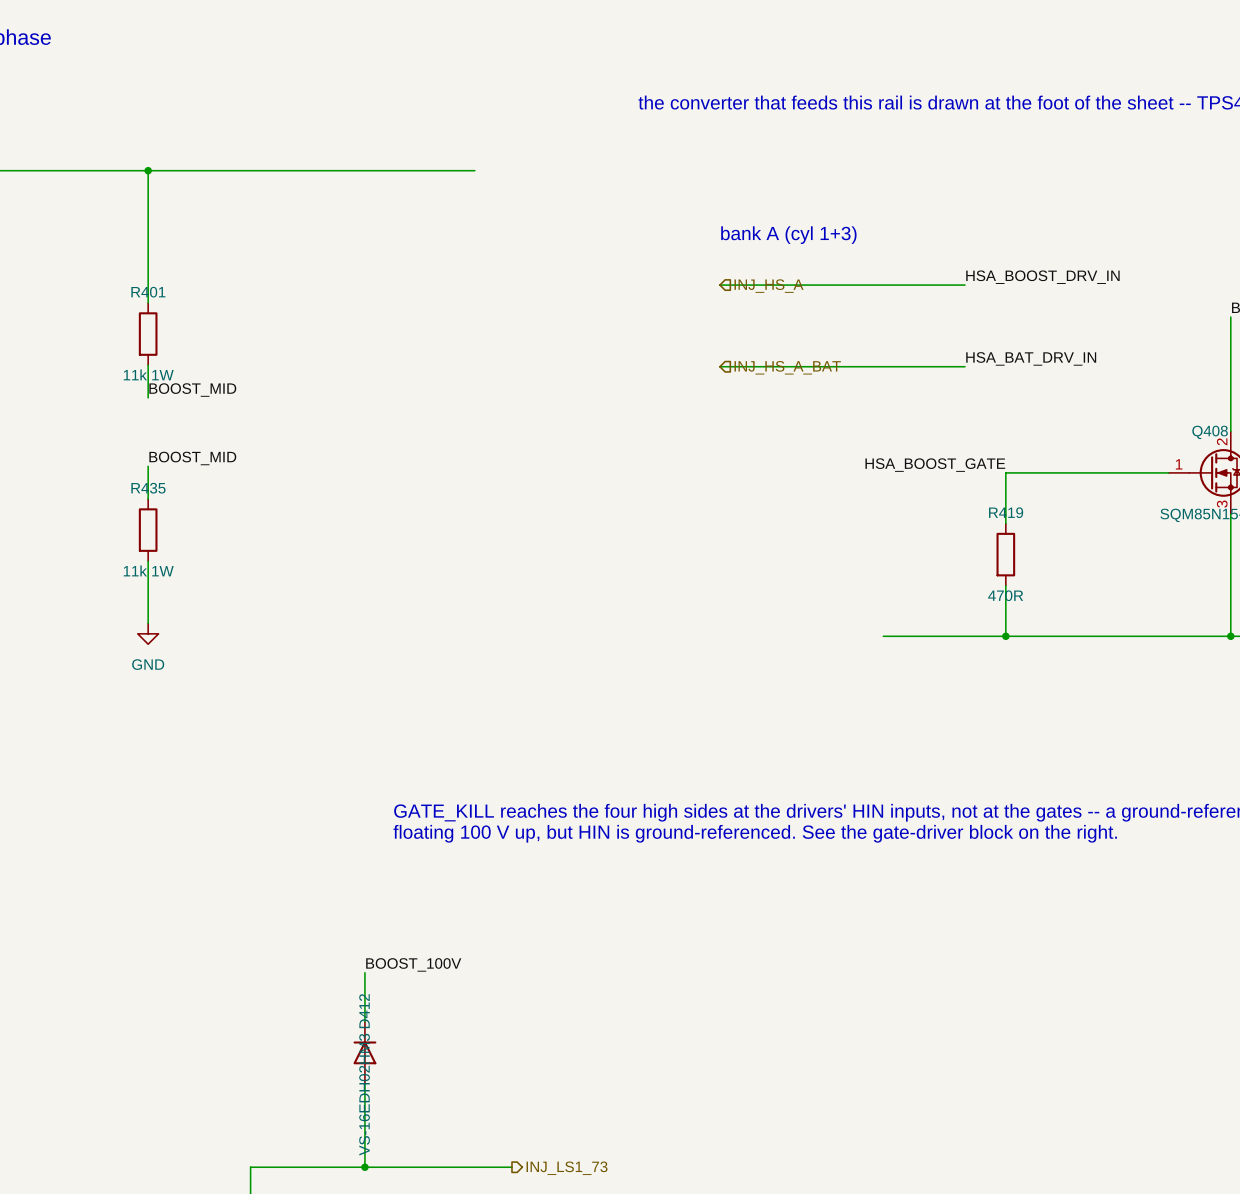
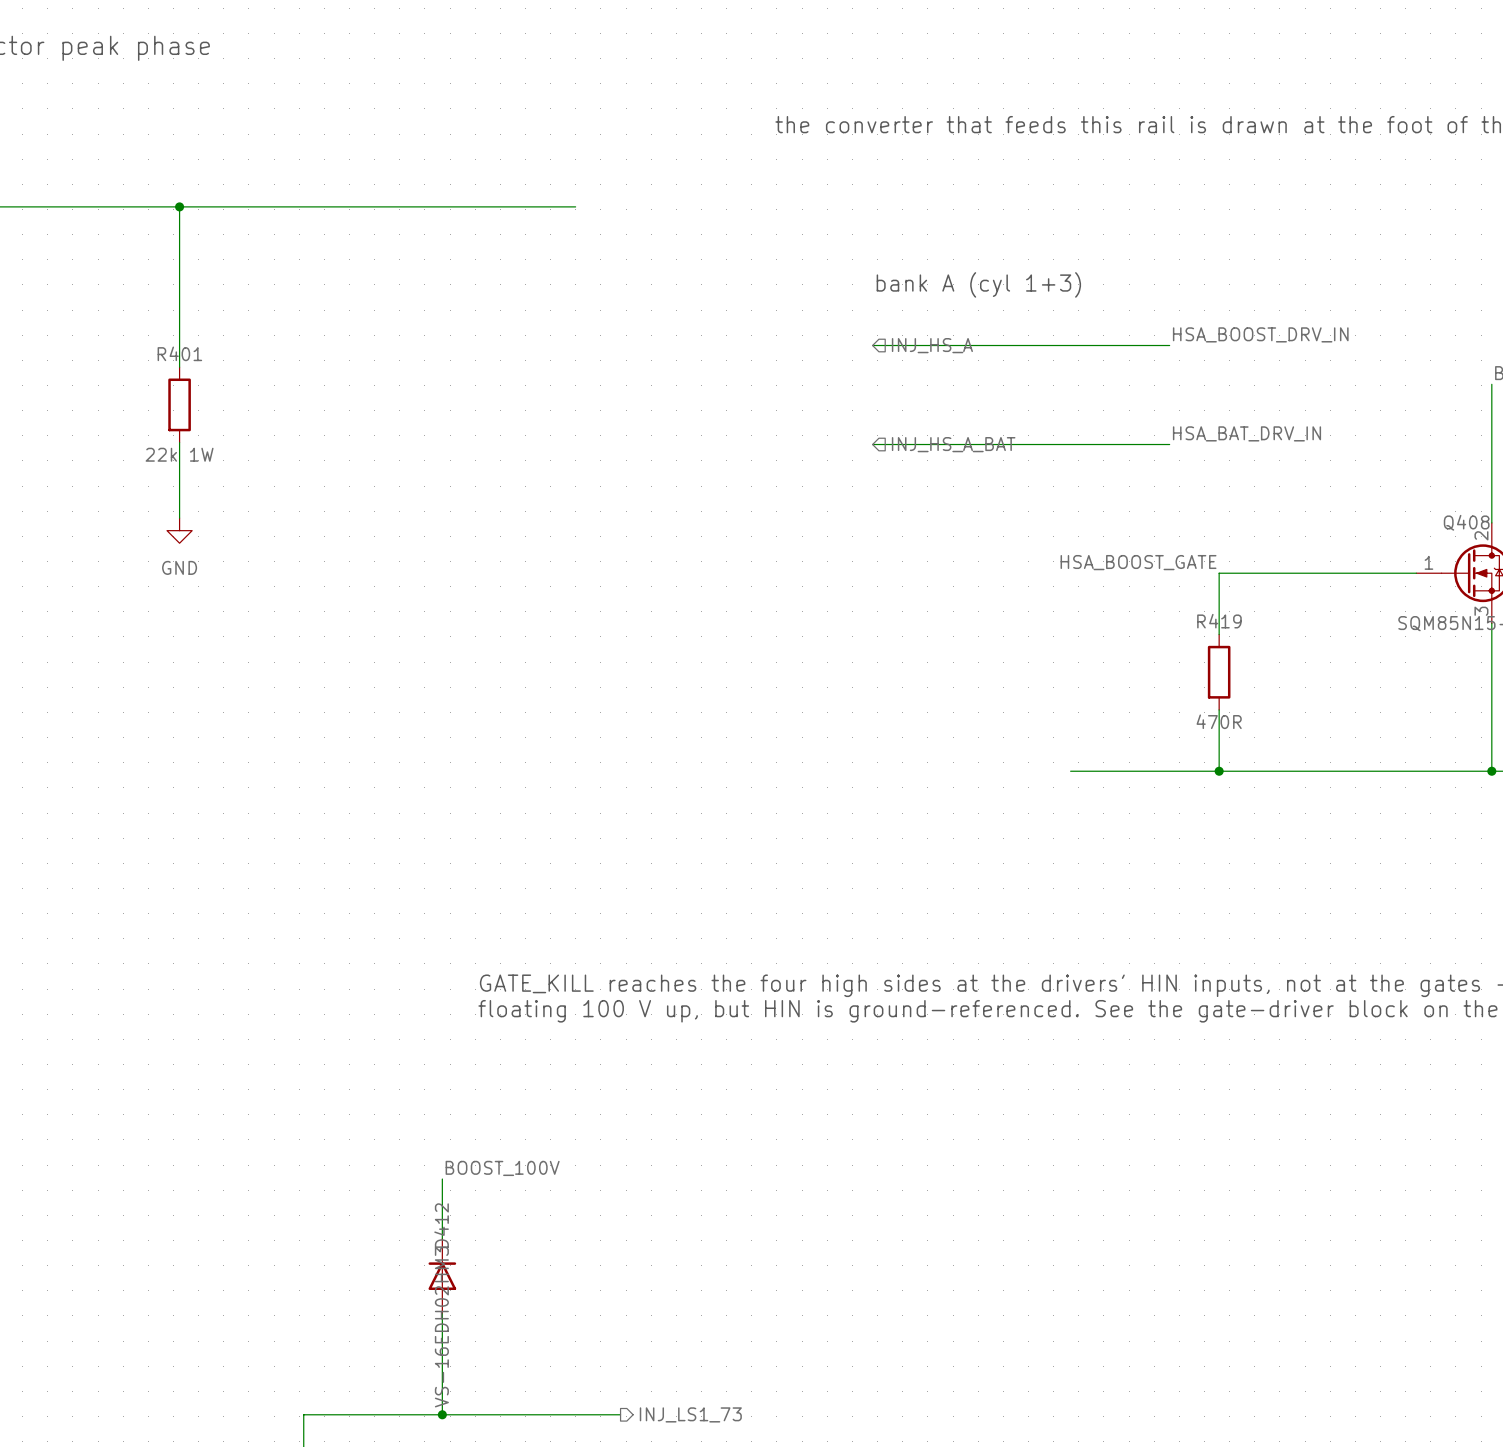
R401 value: 11k 1W (148, 374) -> 22k 1W (179, 454)
label: BOOST_MID (192, 390) -> none
wire: none -> (179, 482) (179, 518)
label: BOOST_MID (192, 458) -> none
wire: (148, 466) (148, 498) -> none
R435: 11k 1W (148, 530) -> none
wire: (148, 561) (148, 623) -> none
power symbol position: GND (148, 633) -> GND (179, 530)

